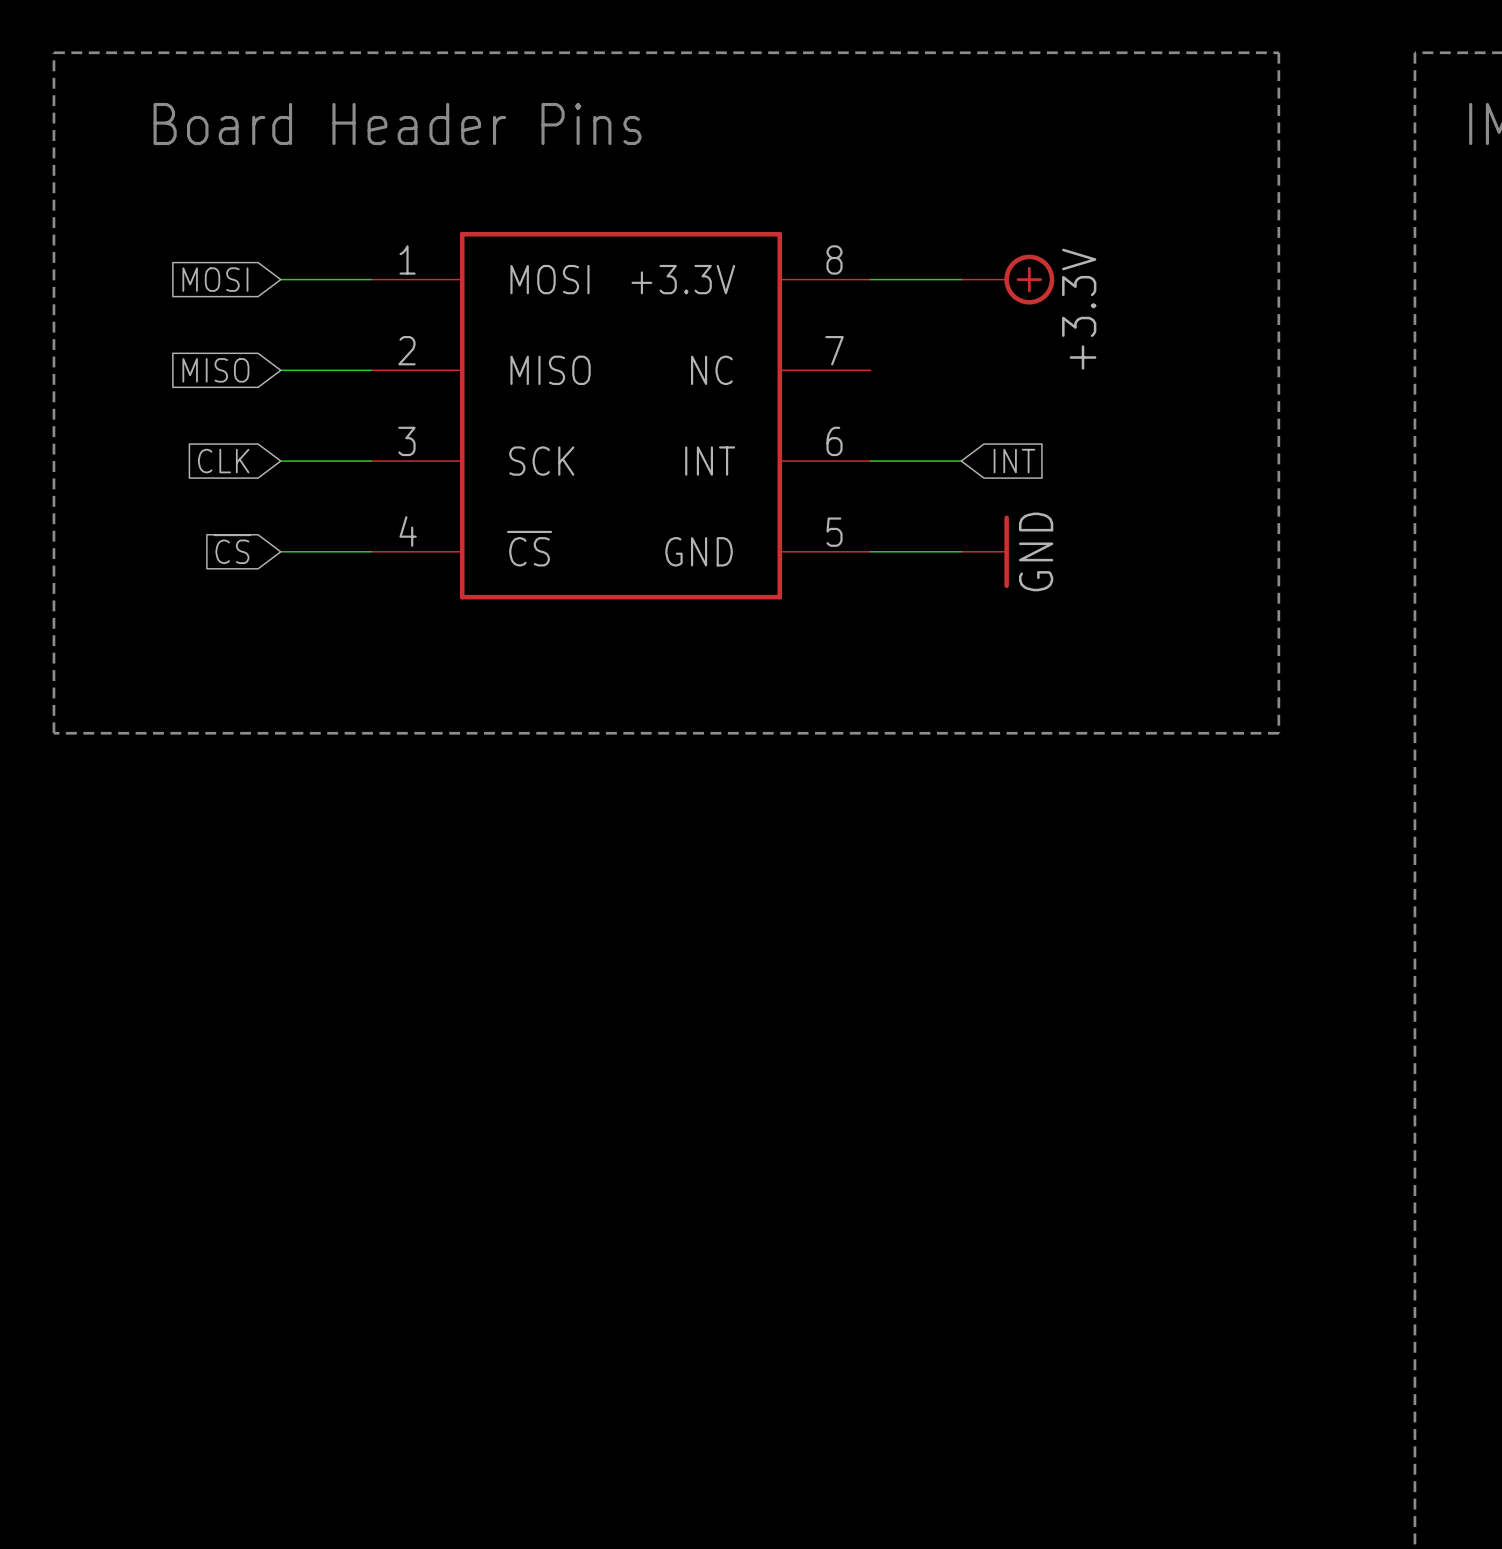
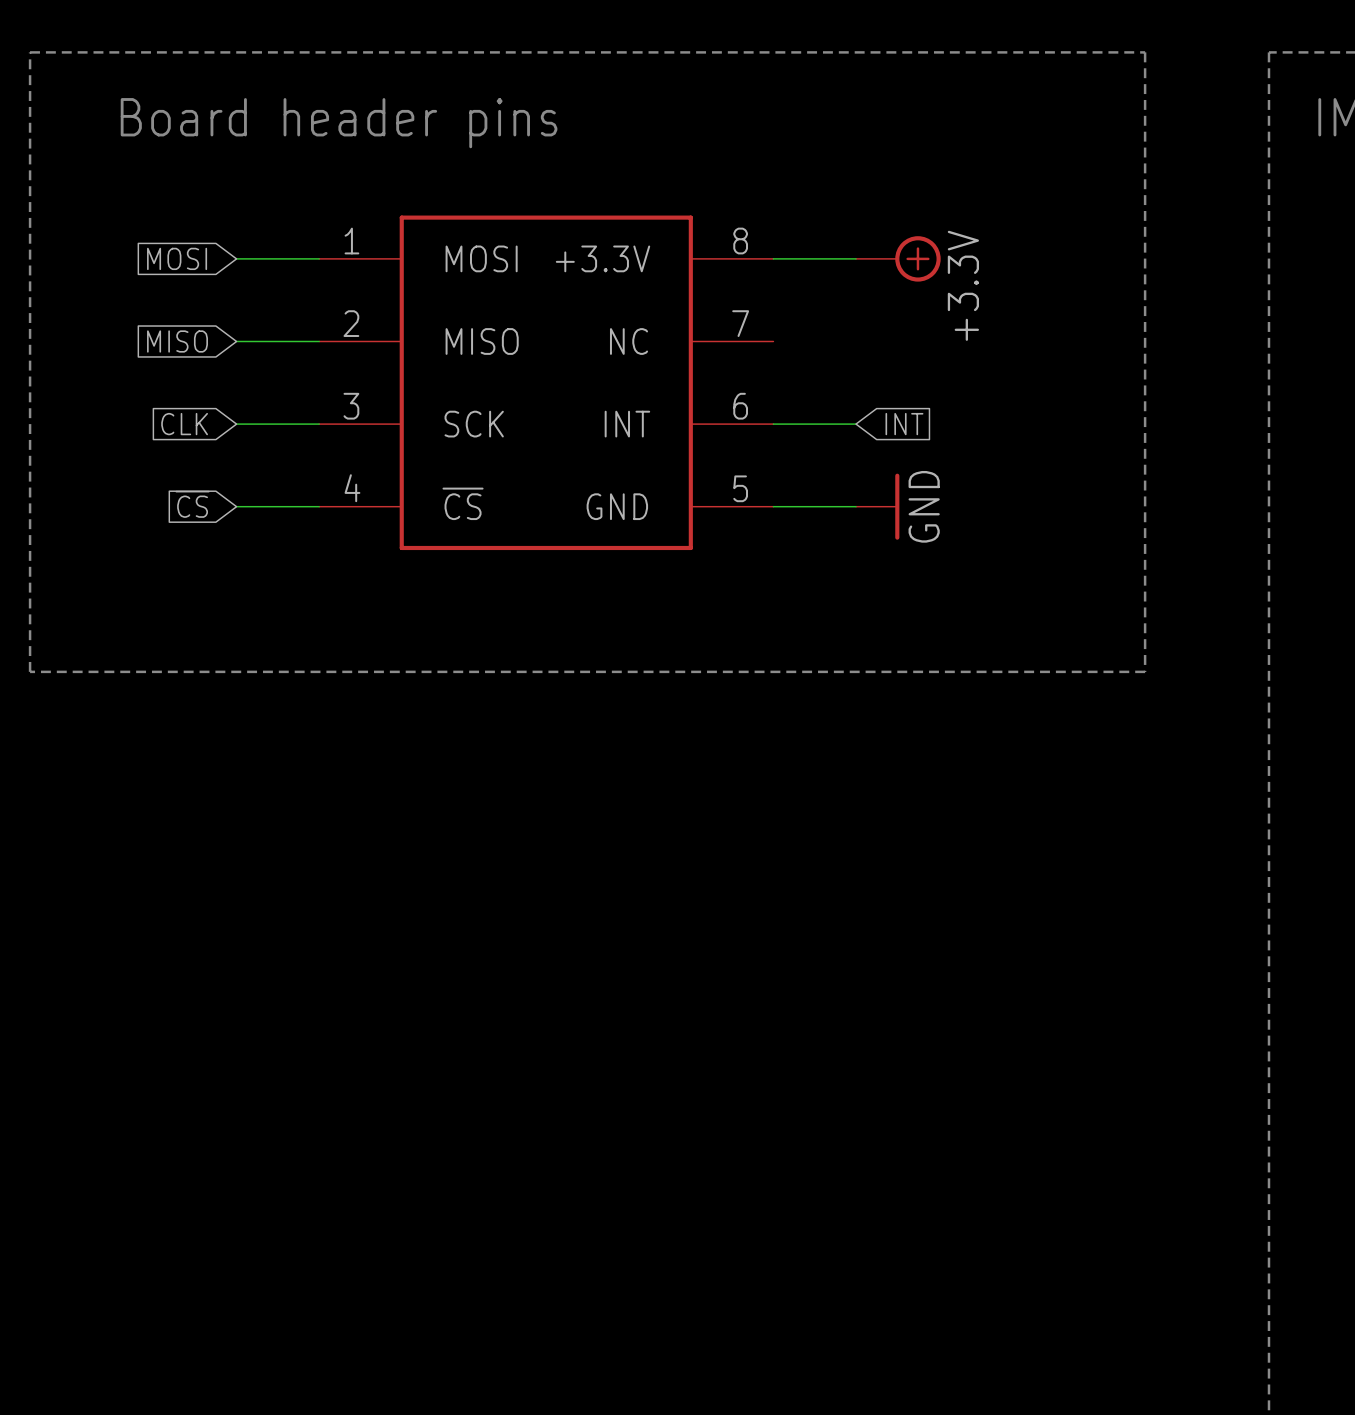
text: Board Header Pins (397, 123) -> Board header pins (339, 123)

